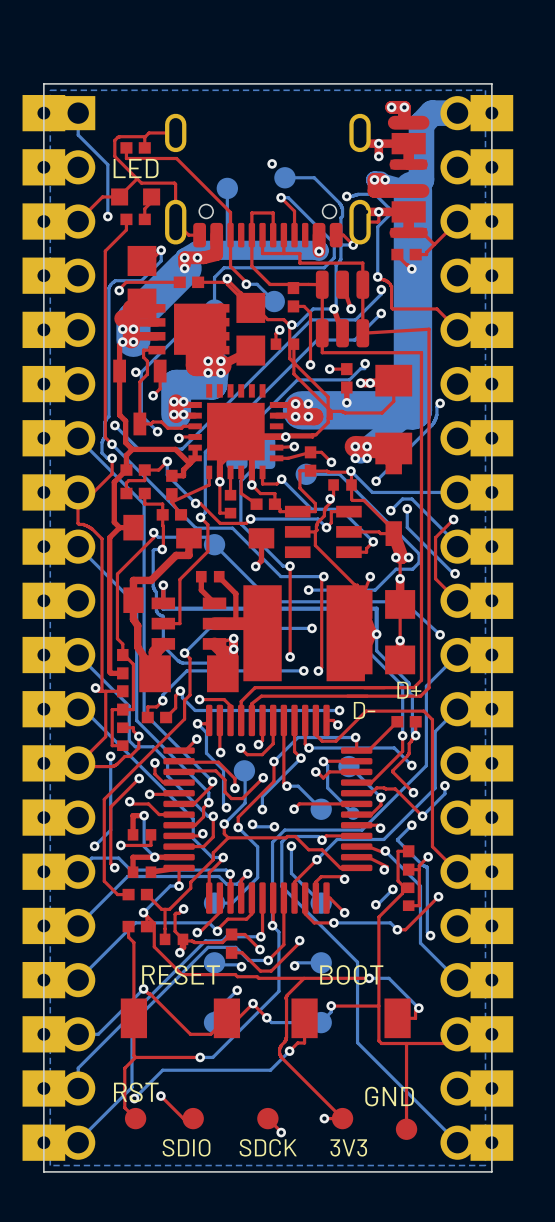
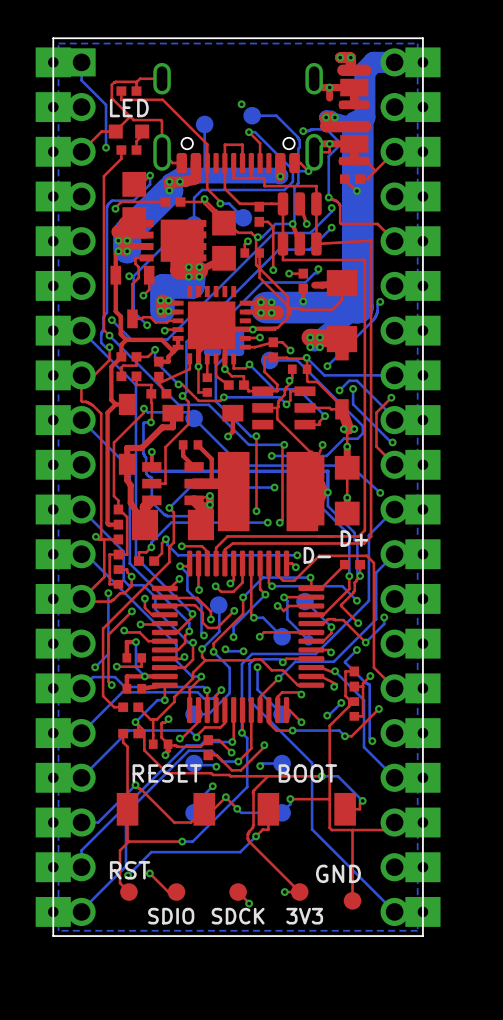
via: (378, 156) -> none
via: (360, 383) -> none
via: (370, 383) -> none

